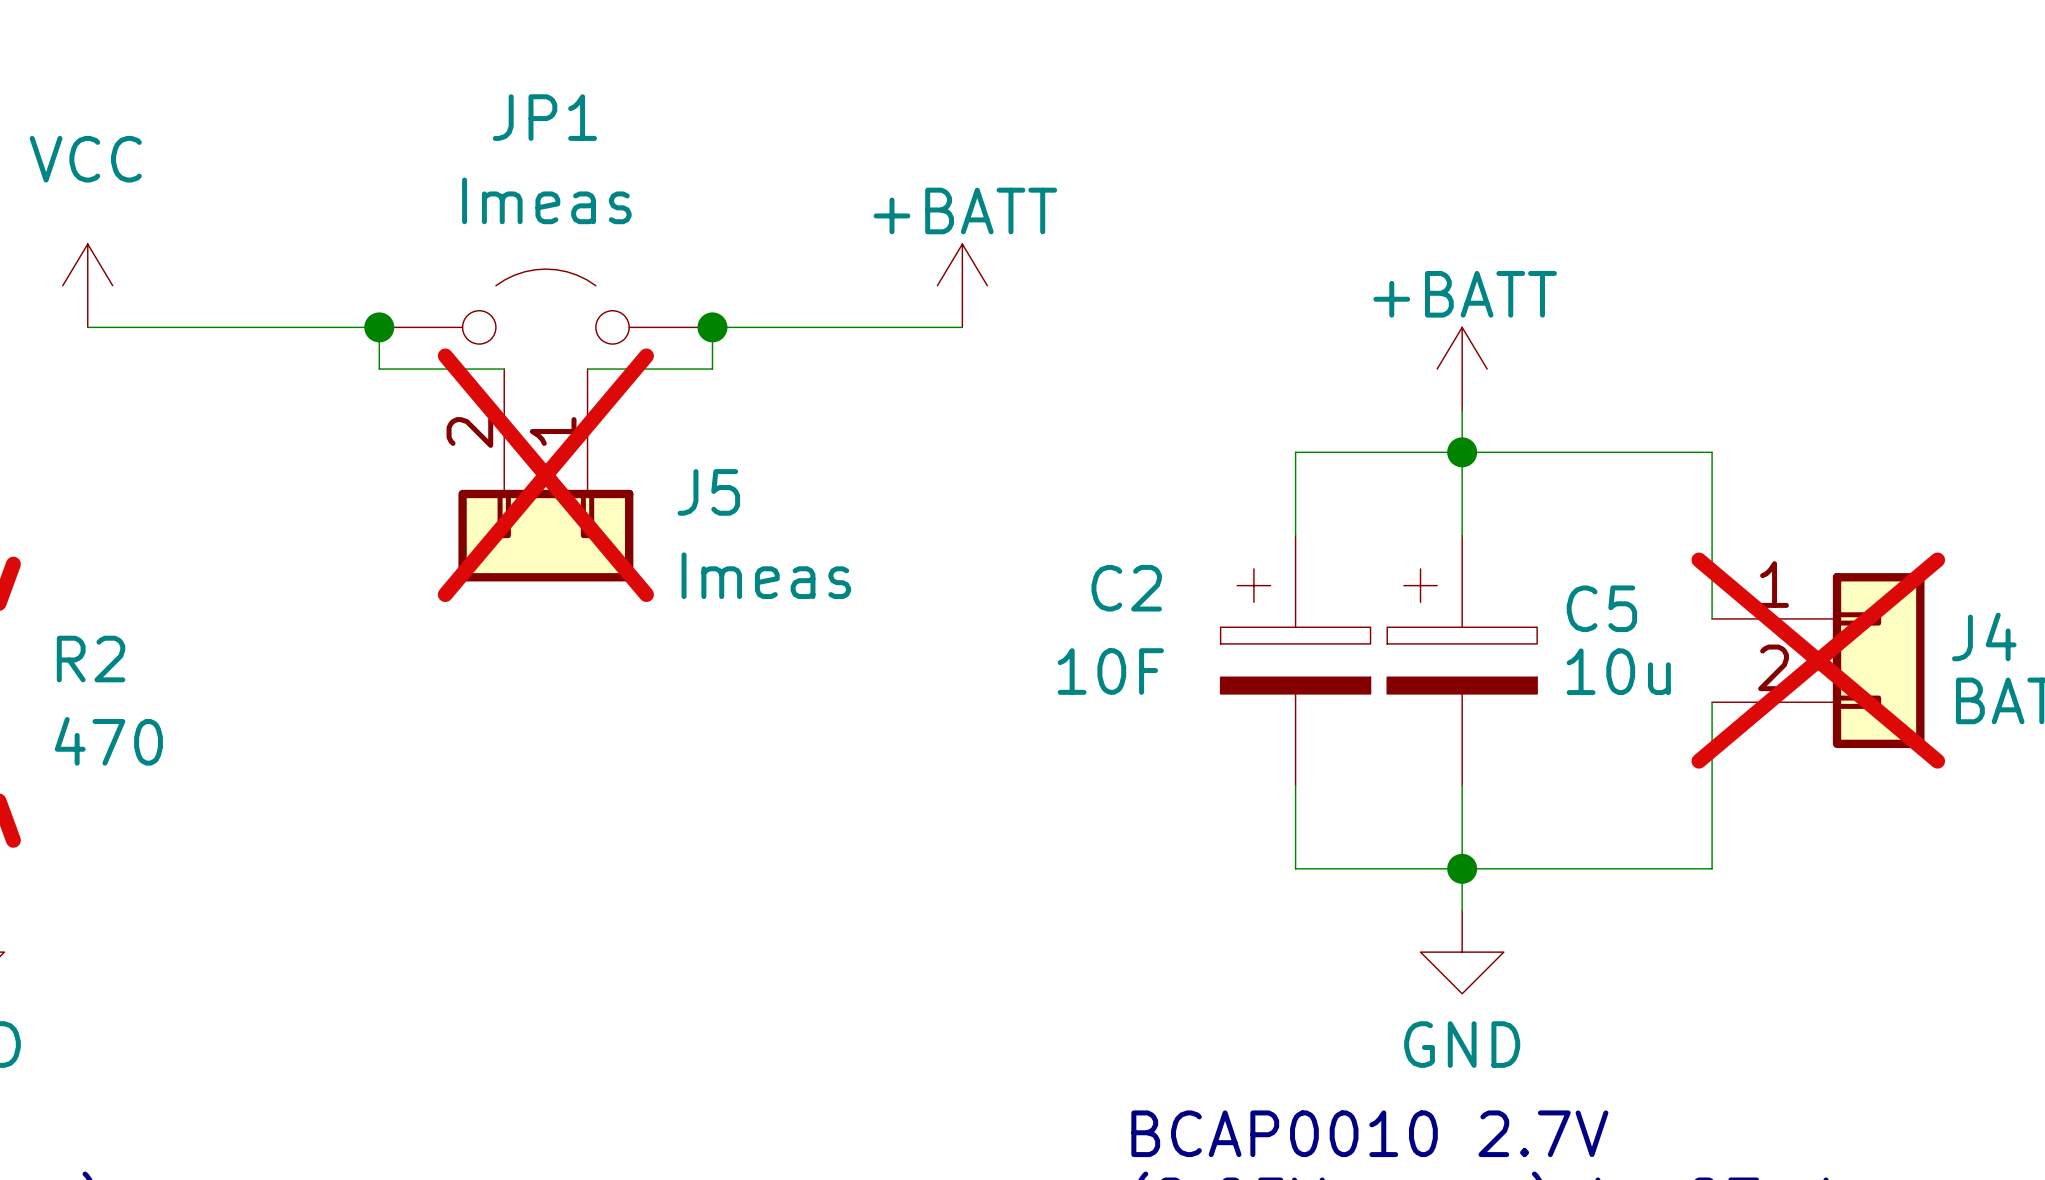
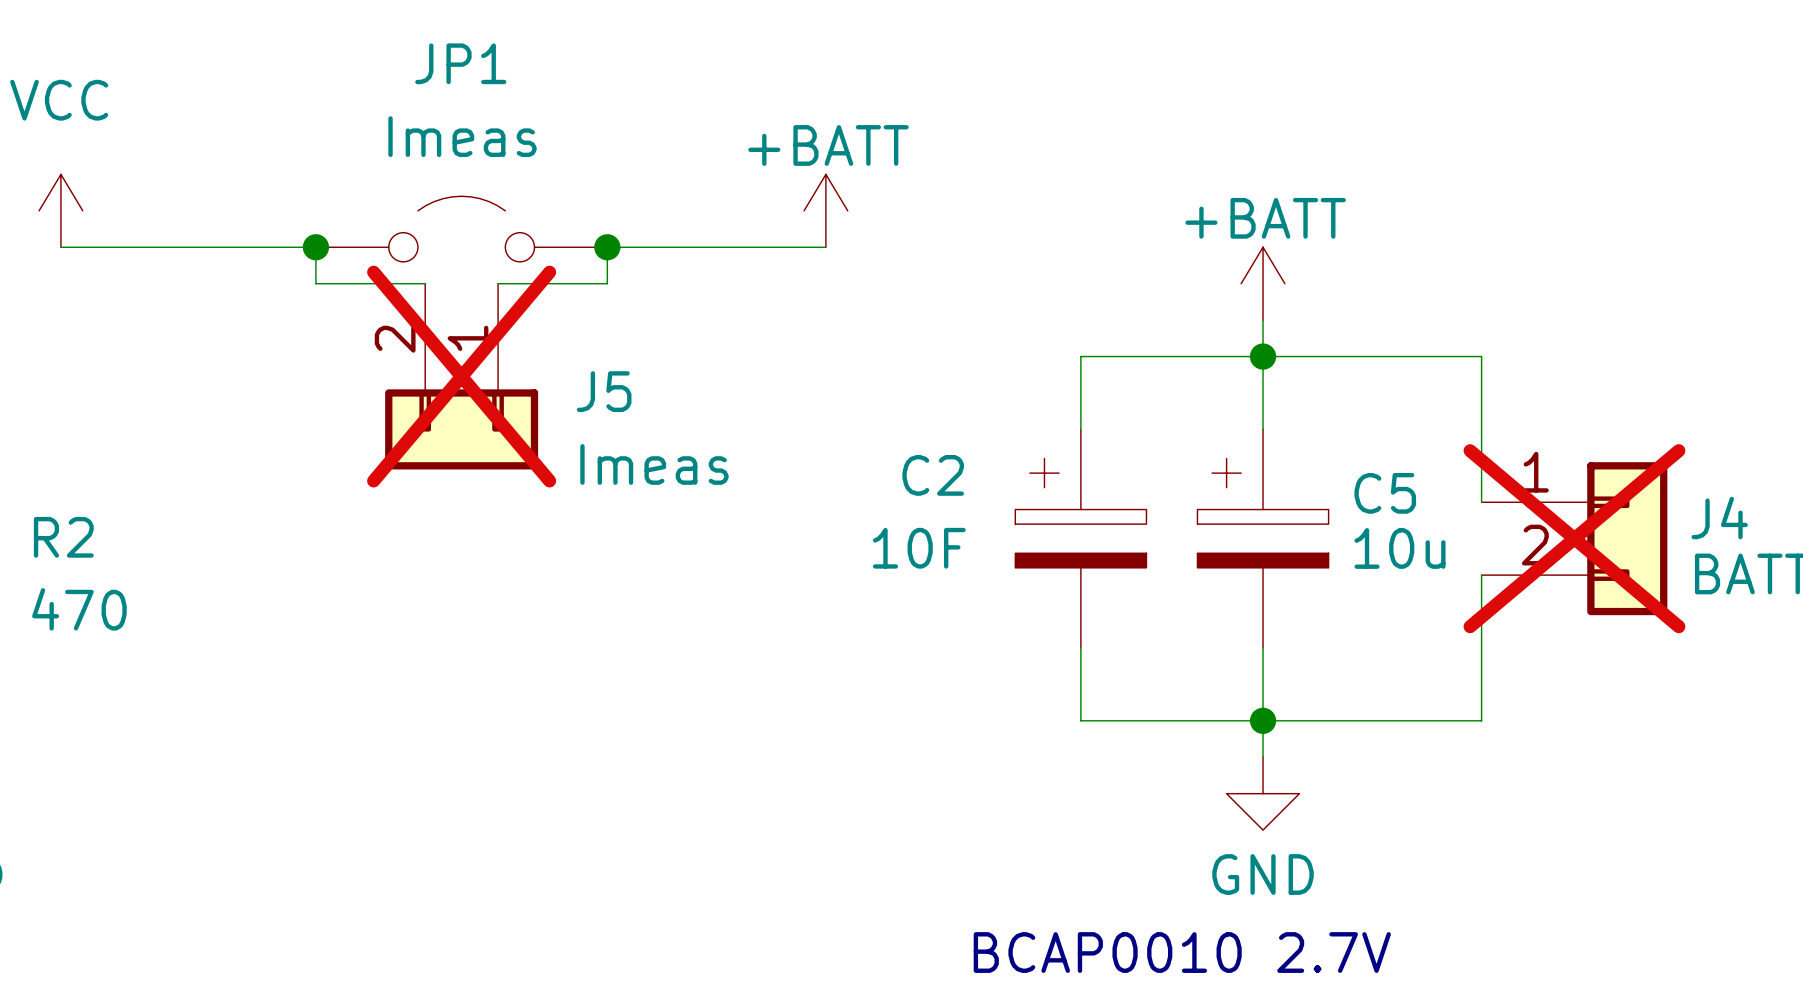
wire: (1295, 452) (1295, 535) -> (1117, 356) (1080, 356) (1080, 429)
C2 position: (1295, 660) -> (1080, 538)
wire: (1295, 785) (1295, 868) -> (1080, 647) (1080, 720) (1117, 720)

